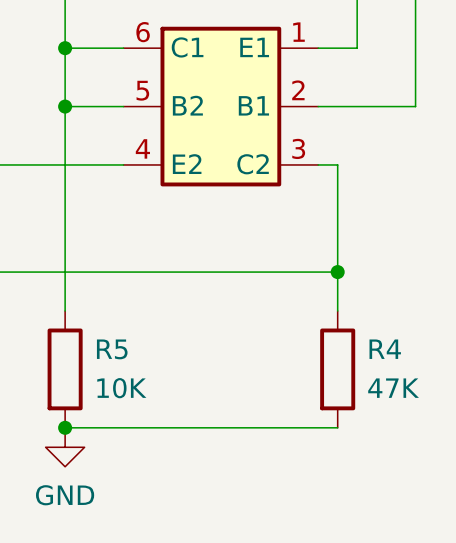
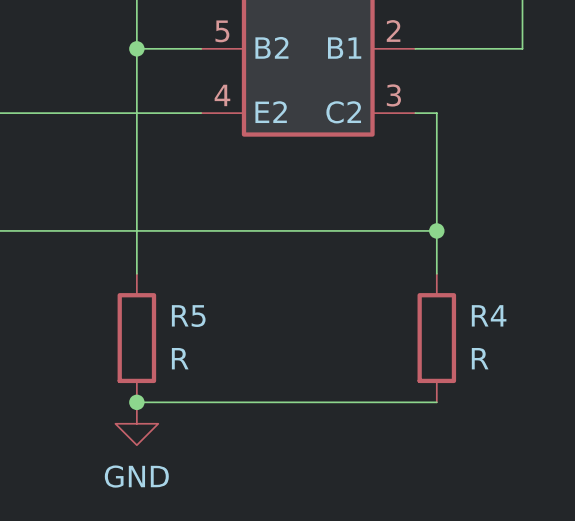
R5 value: 10K (121, 388) -> R (180, 358)
R4 value: 47K (393, 388) -> R (480, 358)

